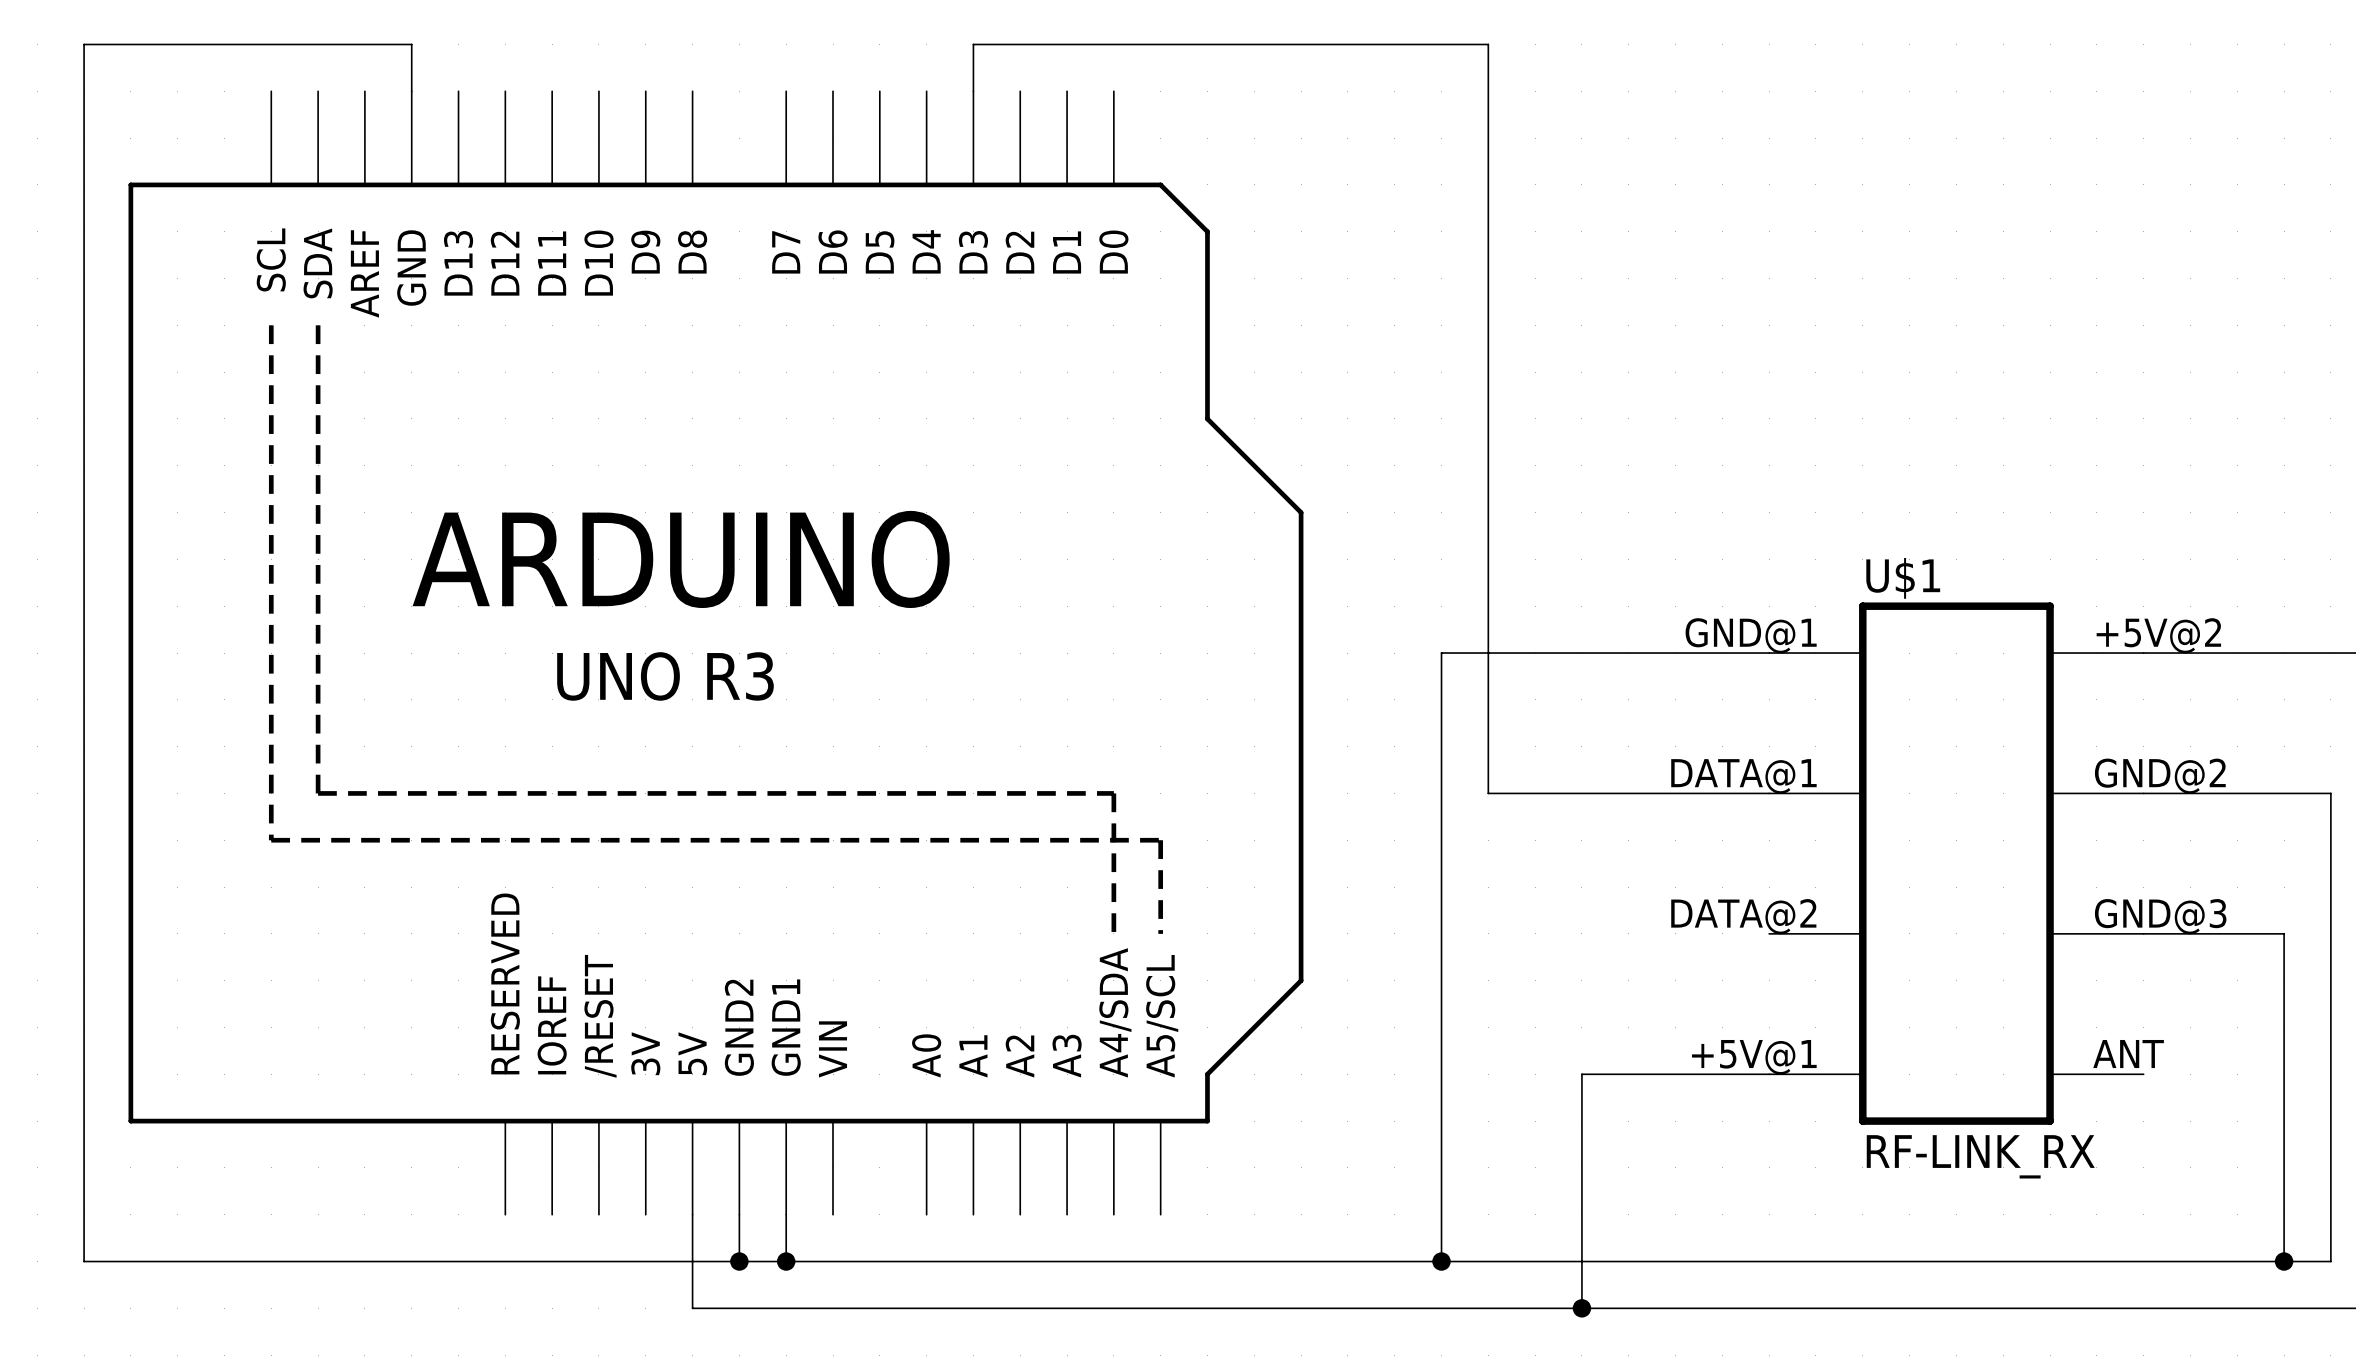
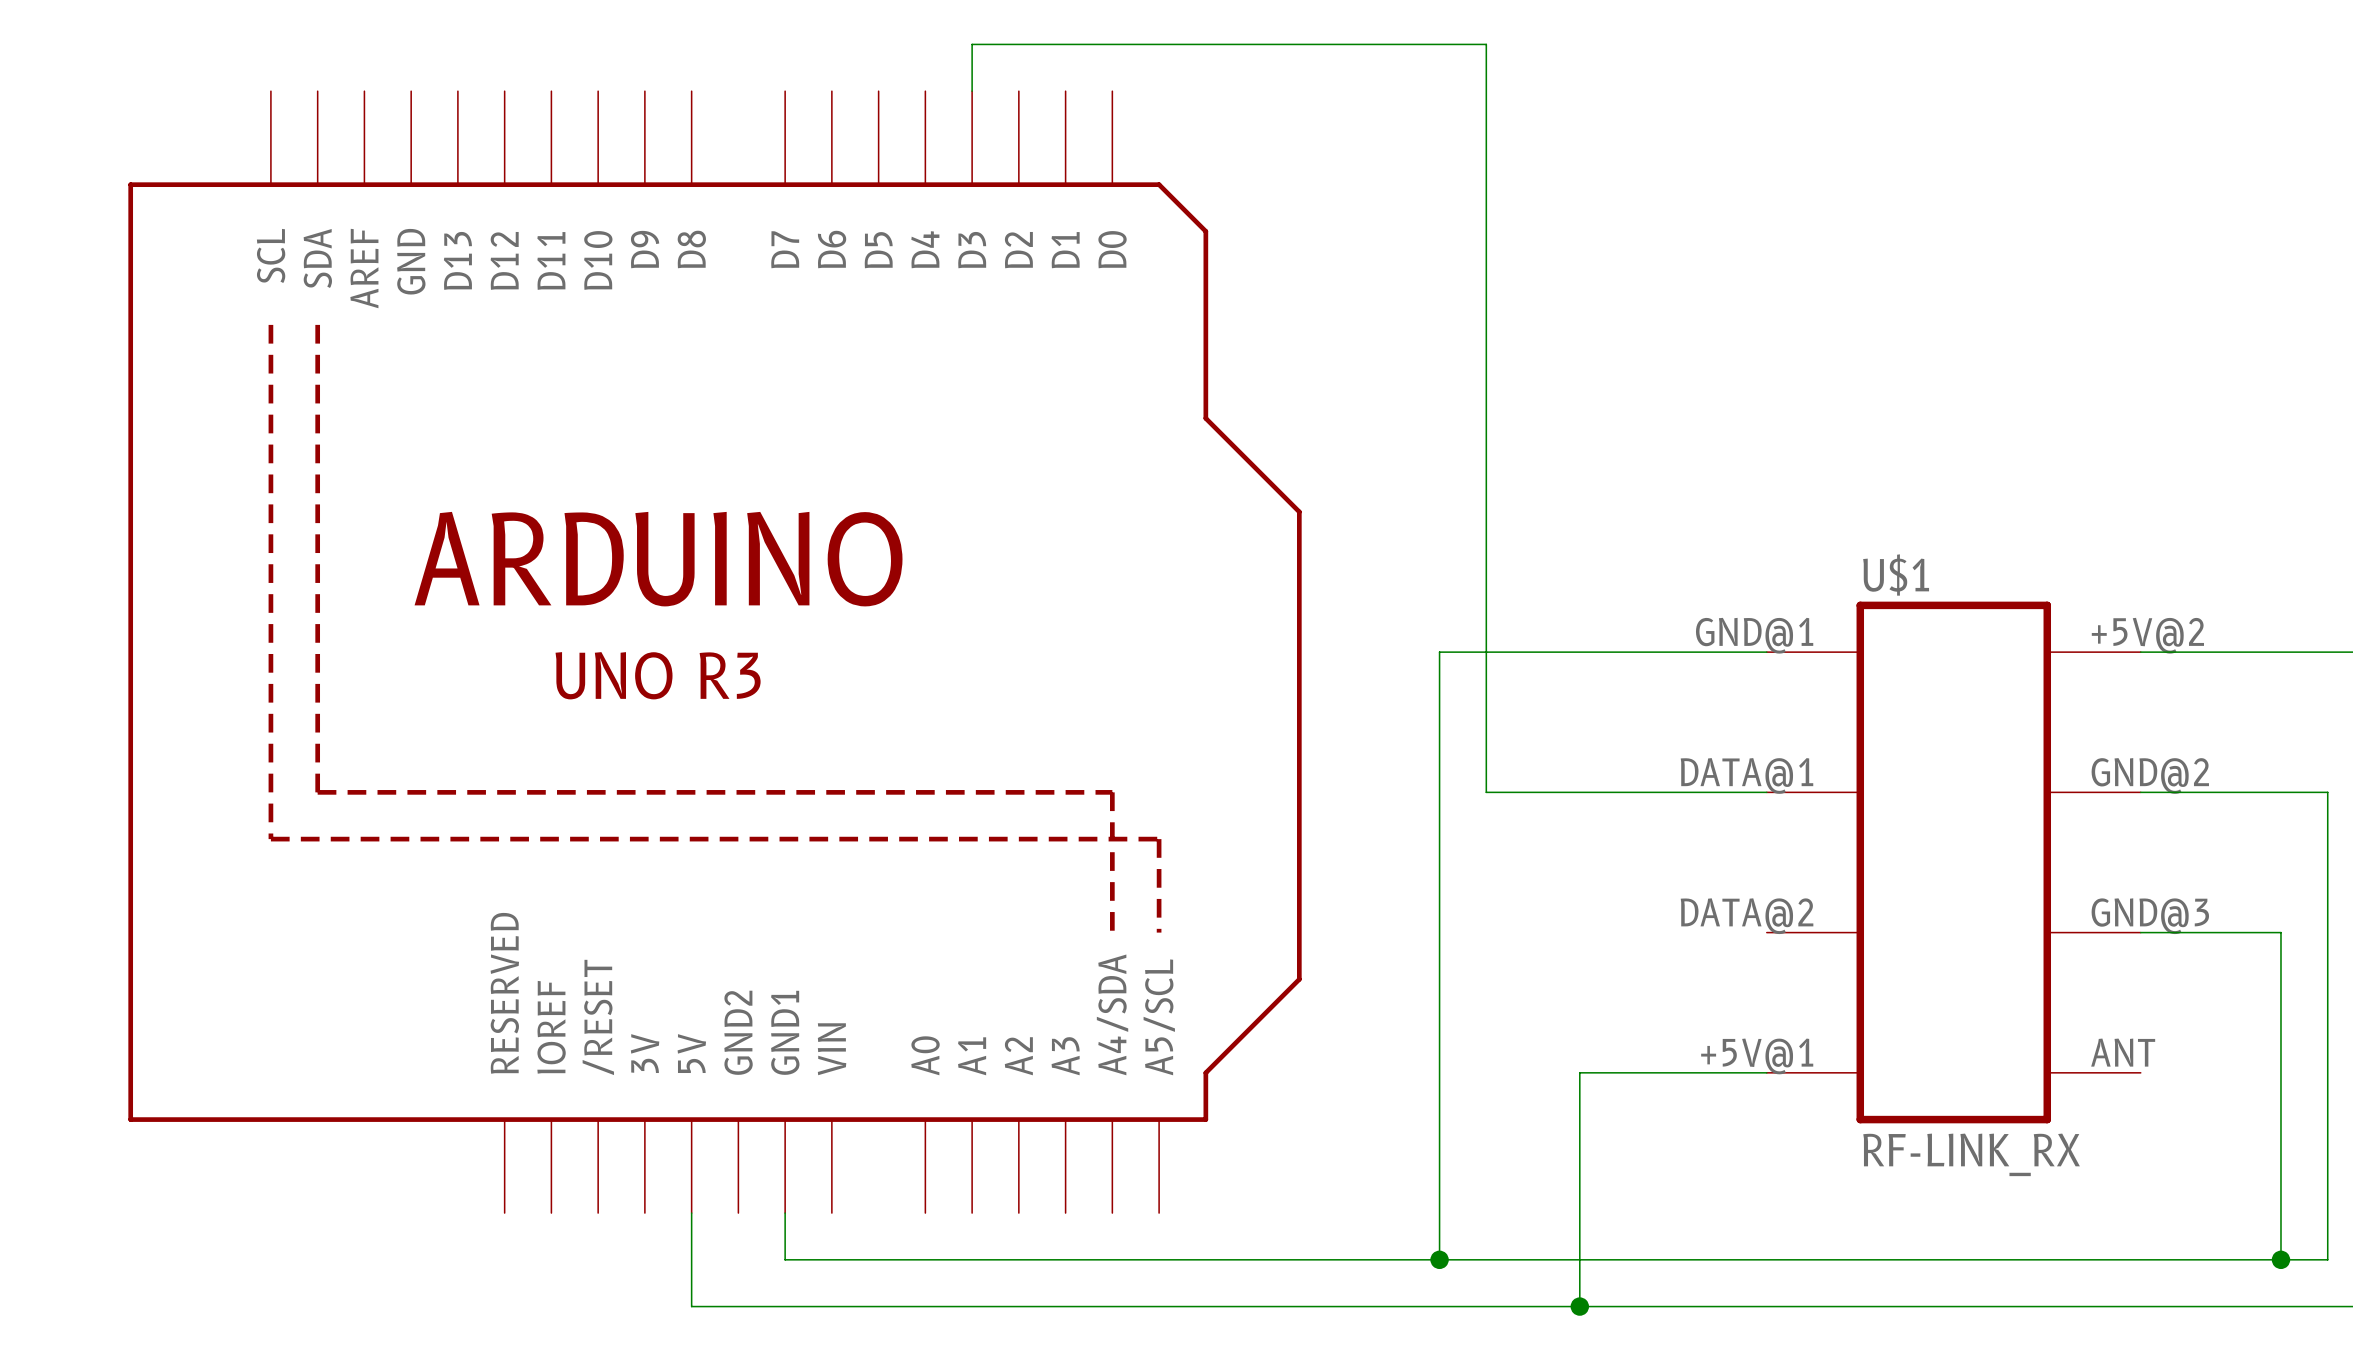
wire: (411, 91) (411, 44) (84, 44) (84, 1261) (786, 1261) -> none
wire: (739, 1214) (739, 1261) -> none
junction: (739, 1261) -> none
junction: (786, 1261) -> none

